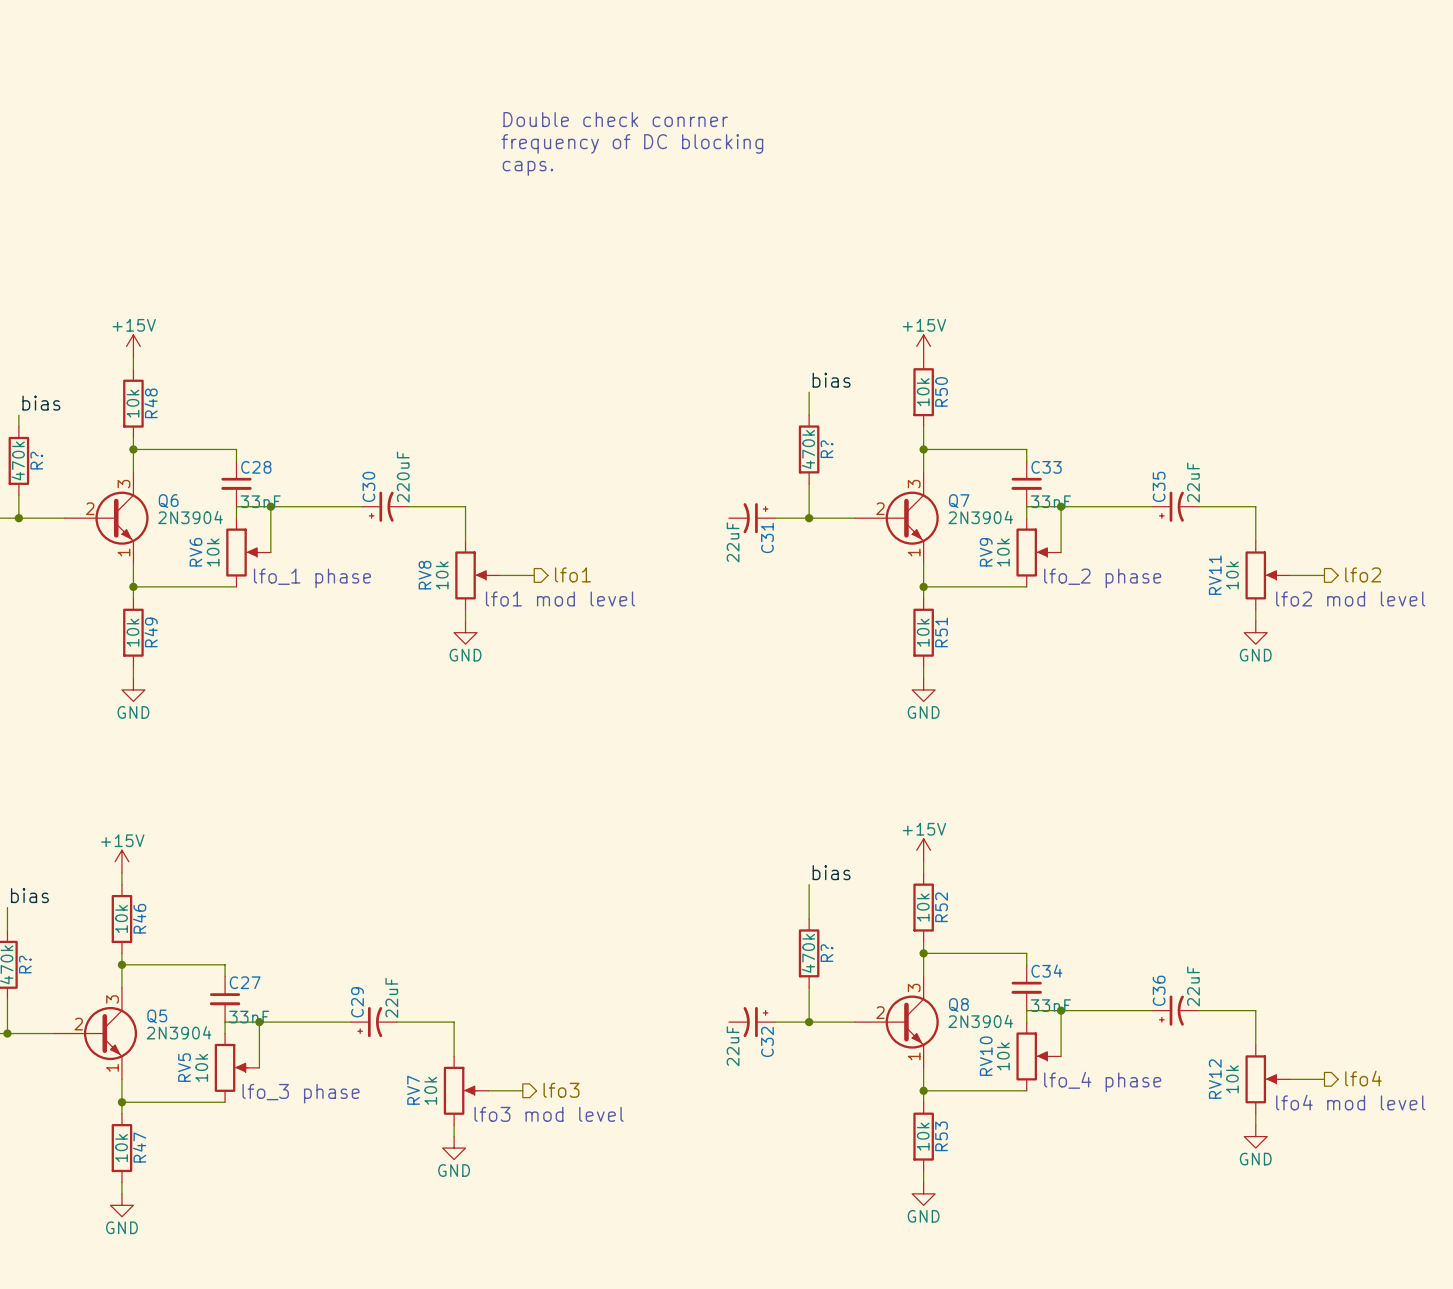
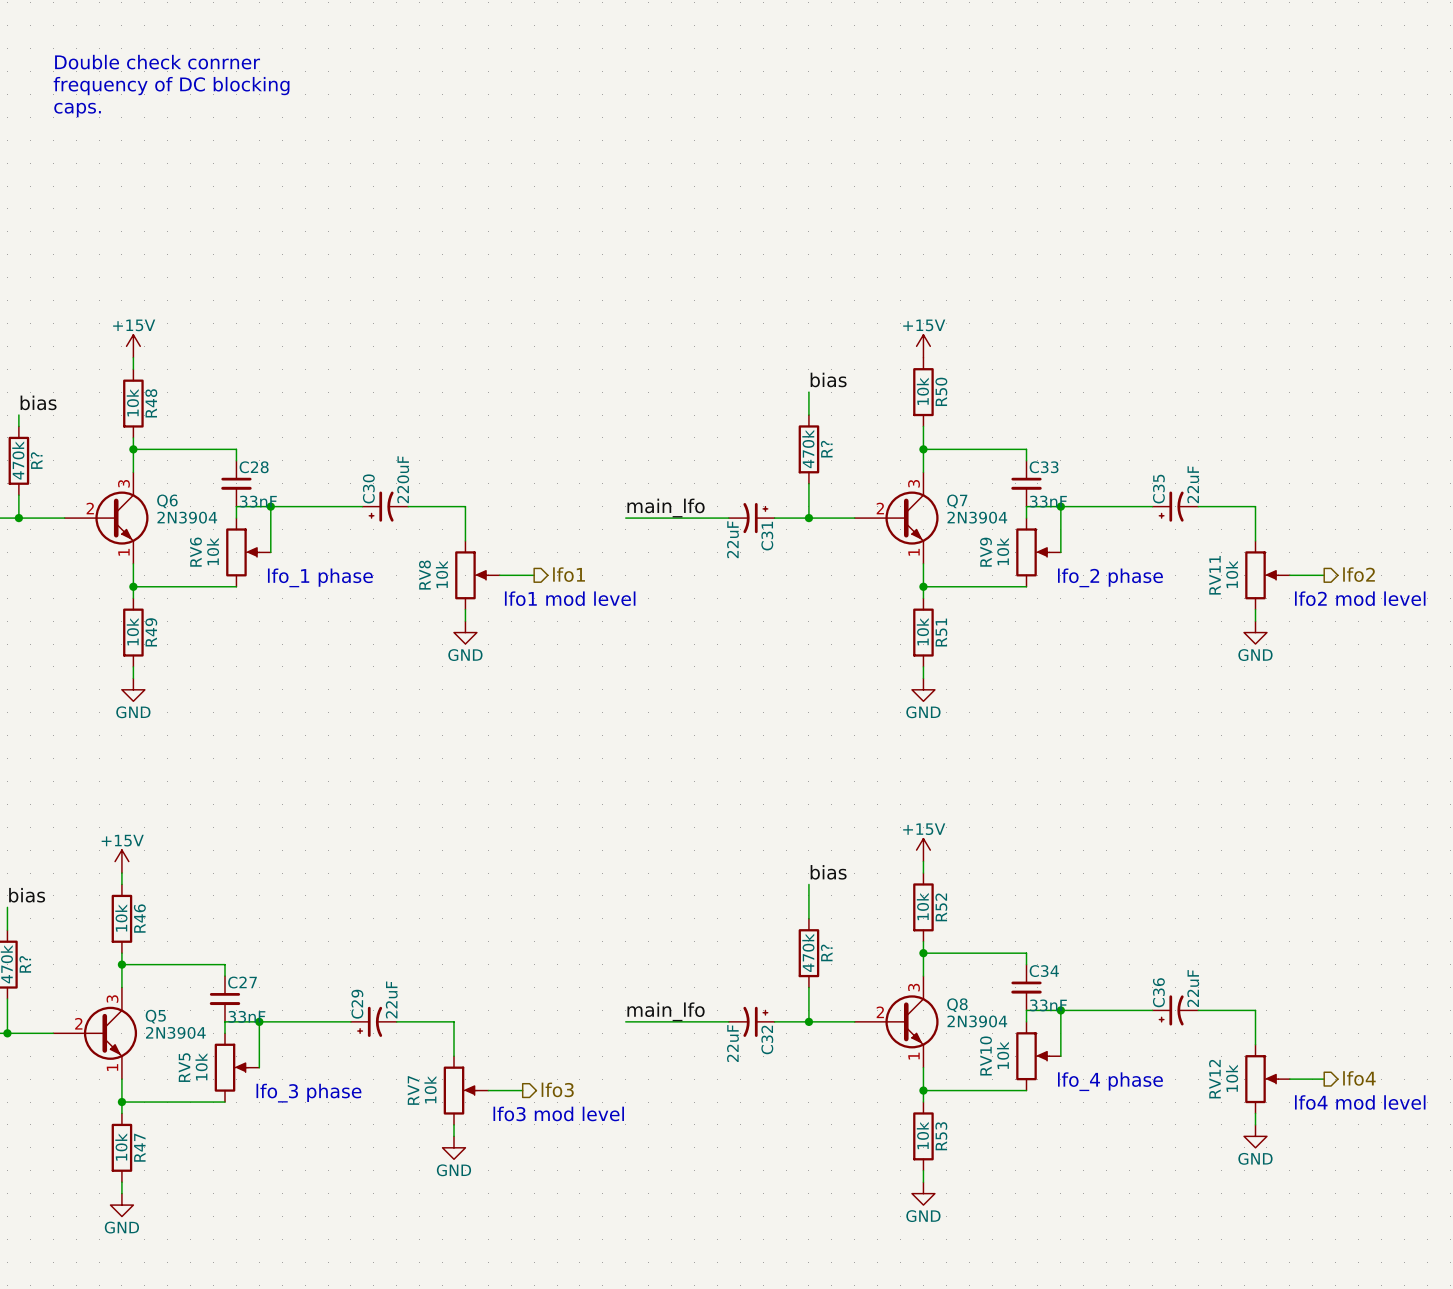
text: none -> Double check conrner (157, 62)
text: none -> frequency of DC blocking (171, 86)
text: none -> caps. (77, 110)
text: Double check conrner (615, 119) -> none
text: frequency of DC blocking (632, 143) -> none
text: caps. (527, 168) -> none
label: none -> main_lfo (666, 508)
wire: none -> (625, 518) (728, 518)
label: none -> main_lfo (666, 1011)
wire: none -> (625, 1021) (728, 1021)

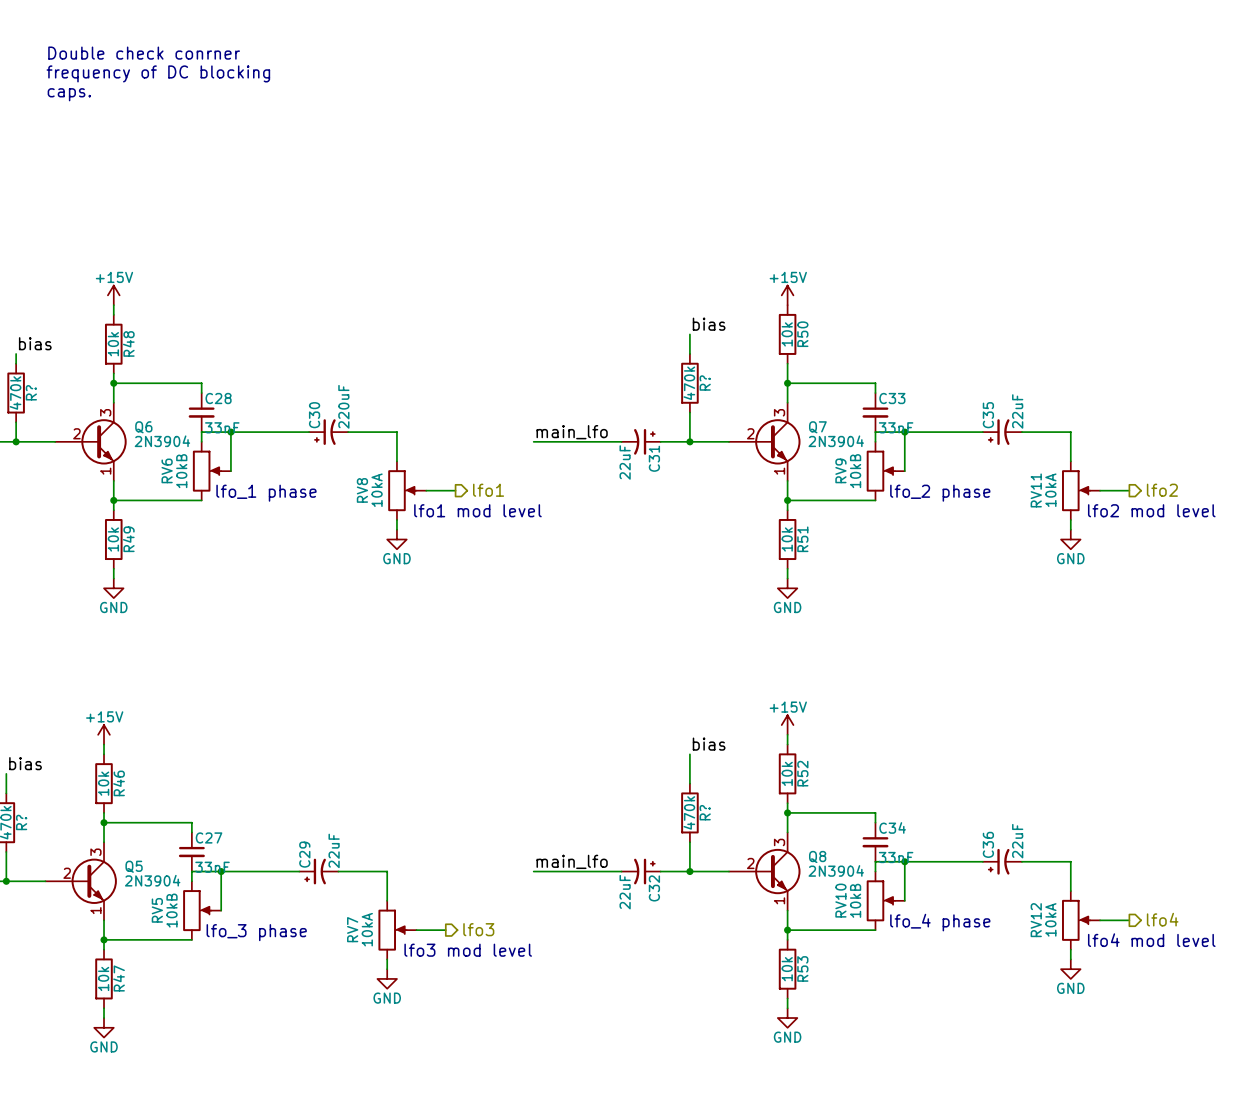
RV6 value: 10k (212, 551) -> 10kB (181, 471)
RV9 value: 10k (1003, 551) -> 10kB (855, 471)
RV8 value: 10k (441, 574) -> 10kA (377, 490)
RV11 value: 10k (1232, 574) -> 10kA (1050, 490)
RV10 value: 10k (1003, 1055) -> 10kB (855, 900)
RV5 value: 10k (201, 1066) -> 10kB (171, 910)
RV12 value: 10k (1232, 1078) -> 10kA (1050, 919)
RV7 value: 10k (430, 1089) -> 10kA (367, 929)

